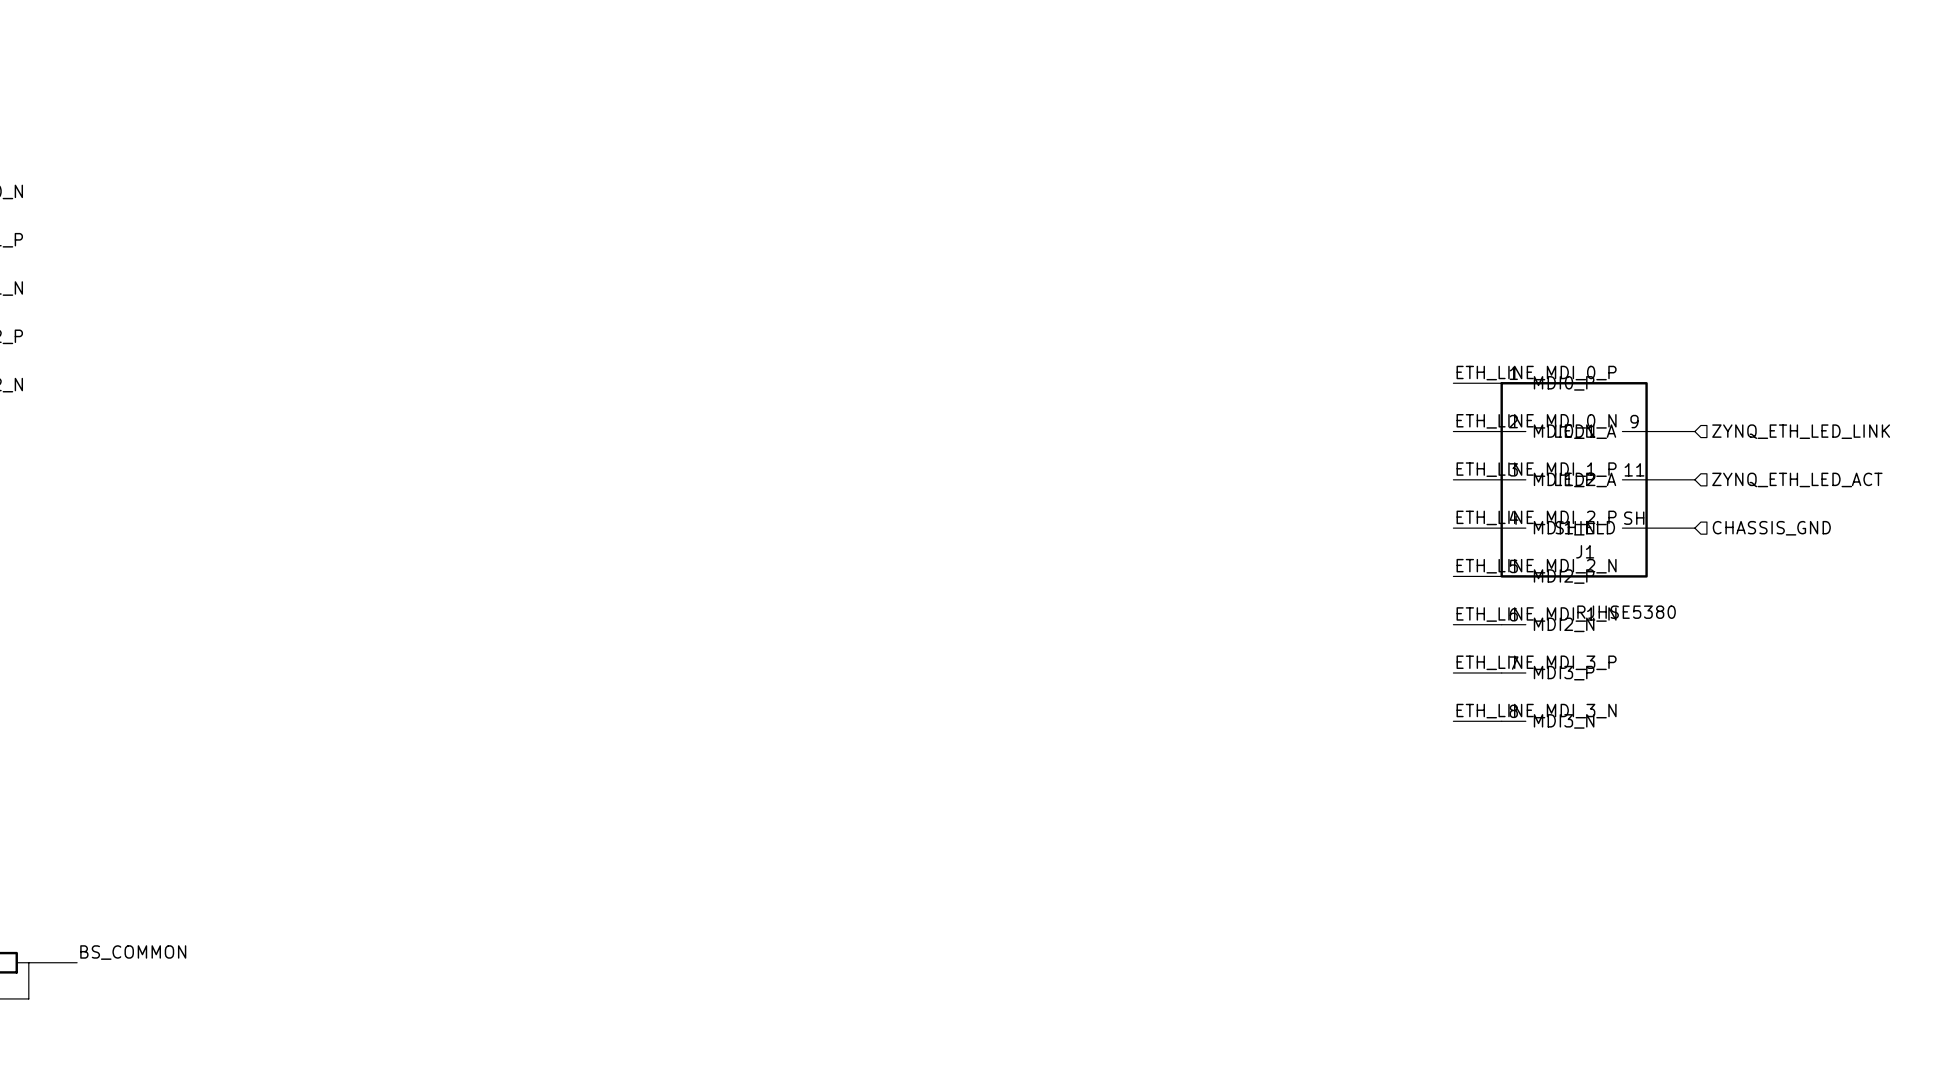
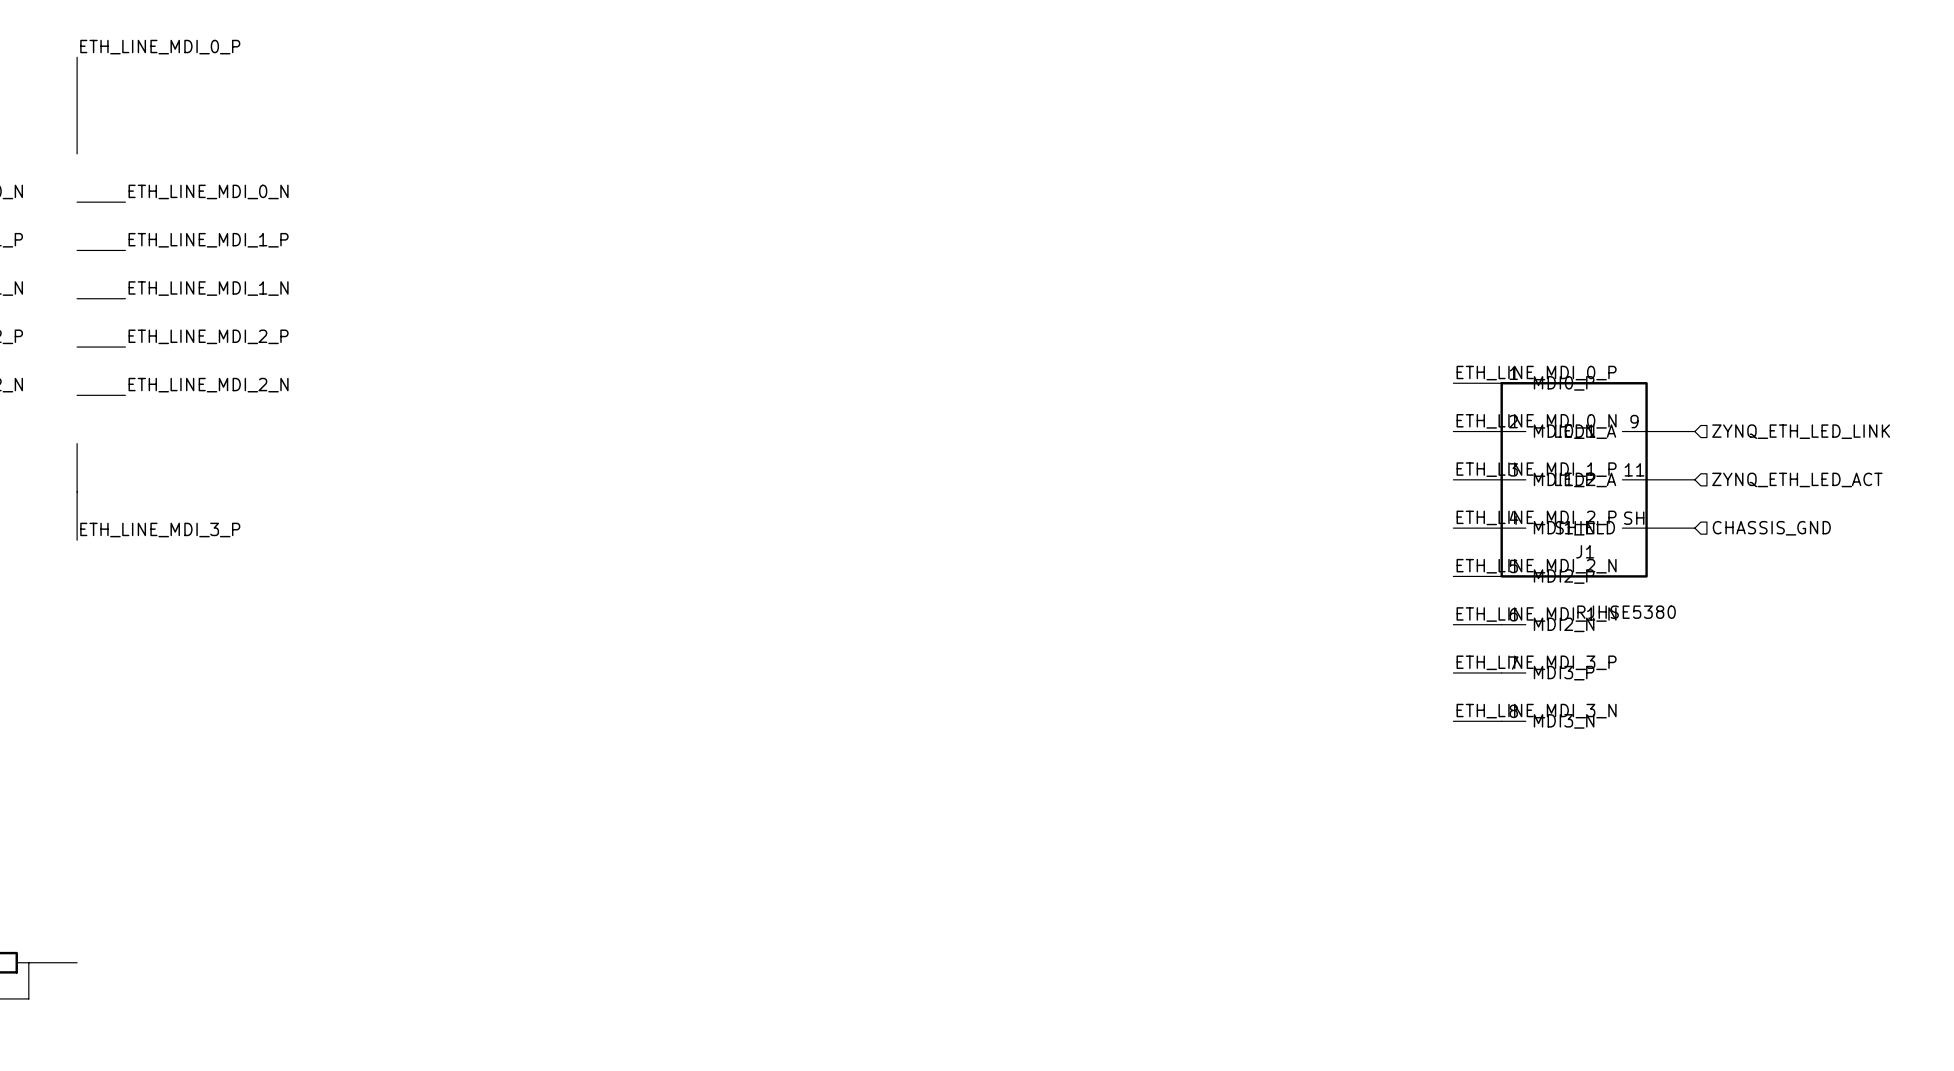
label: none -> ETH_LINE_MDI_0_P (160, 47)
wire: none -> (77, 57) (77, 153)
label: none -> ETH_LINE_MDI_0_N (208, 191)
wire: none -> (77, 202) (125, 202)
label: none -> ETH_LINE_MDI_1_P (208, 240)
wire: none -> (77, 250) (125, 250)
label: none -> ETH_LINE_MDI_1_N (208, 288)
wire: none -> (77, 298) (125, 298)
label: none -> ETH_LINE_MDI_2_P (208, 336)
wire: none -> (77, 347) (125, 347)
label: none -> ETH_LINE_MDI_2_N (208, 385)
wire: none -> (77, 395) (125, 395)
wire: none -> (77, 443) (77, 540)
label: none -> ETH_LINE_MDI_3_P (160, 530)
label: BS_COMMON (133, 952) -> none

